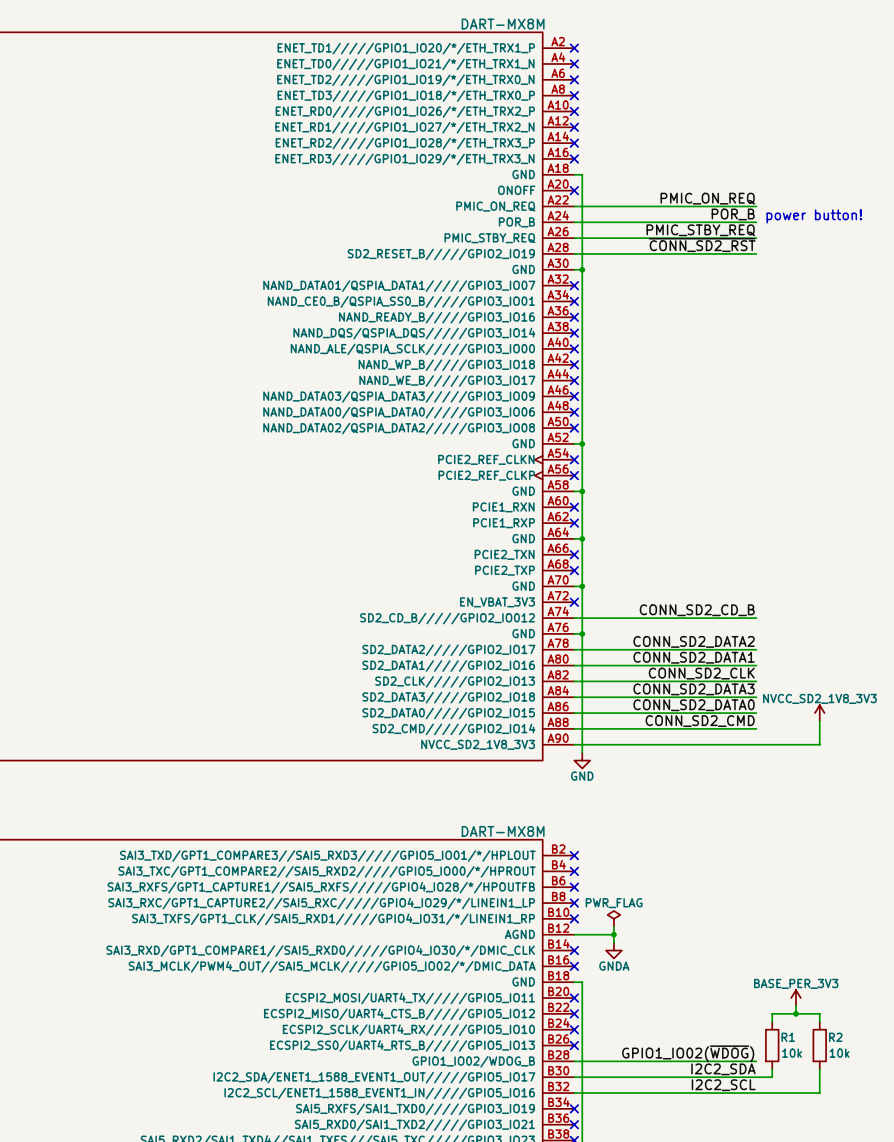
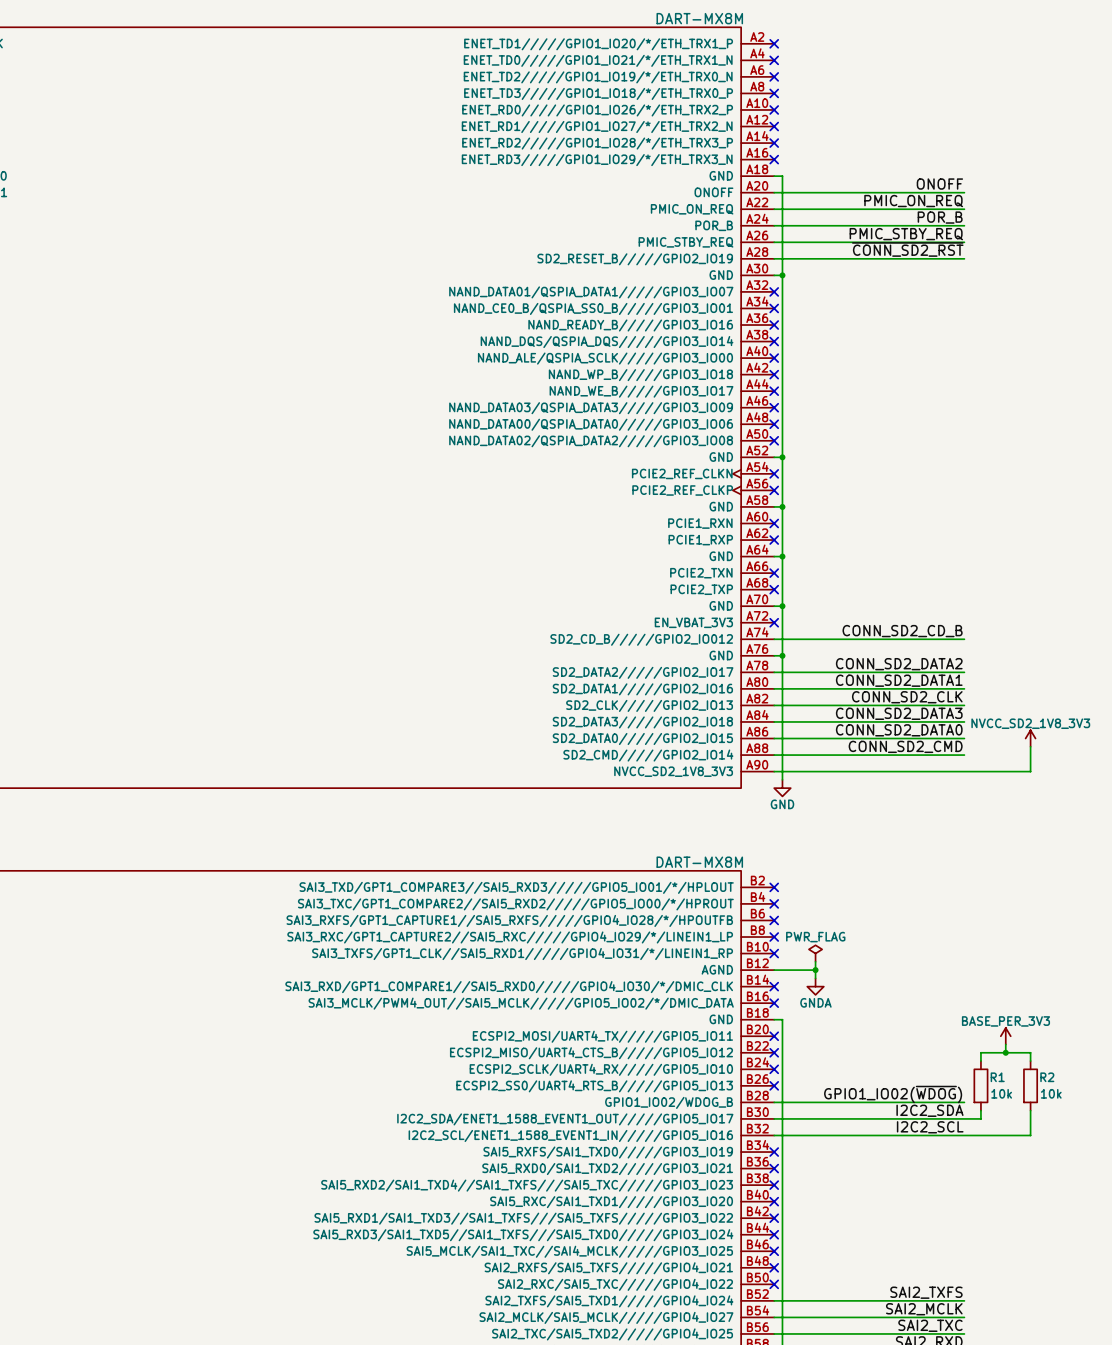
label: none -> ONOFF (939, 184)
wire: none -> (774, 192) (964, 192)
no-connect mark: (574, 190) -> none
text: power button! (814, 216) -> none

